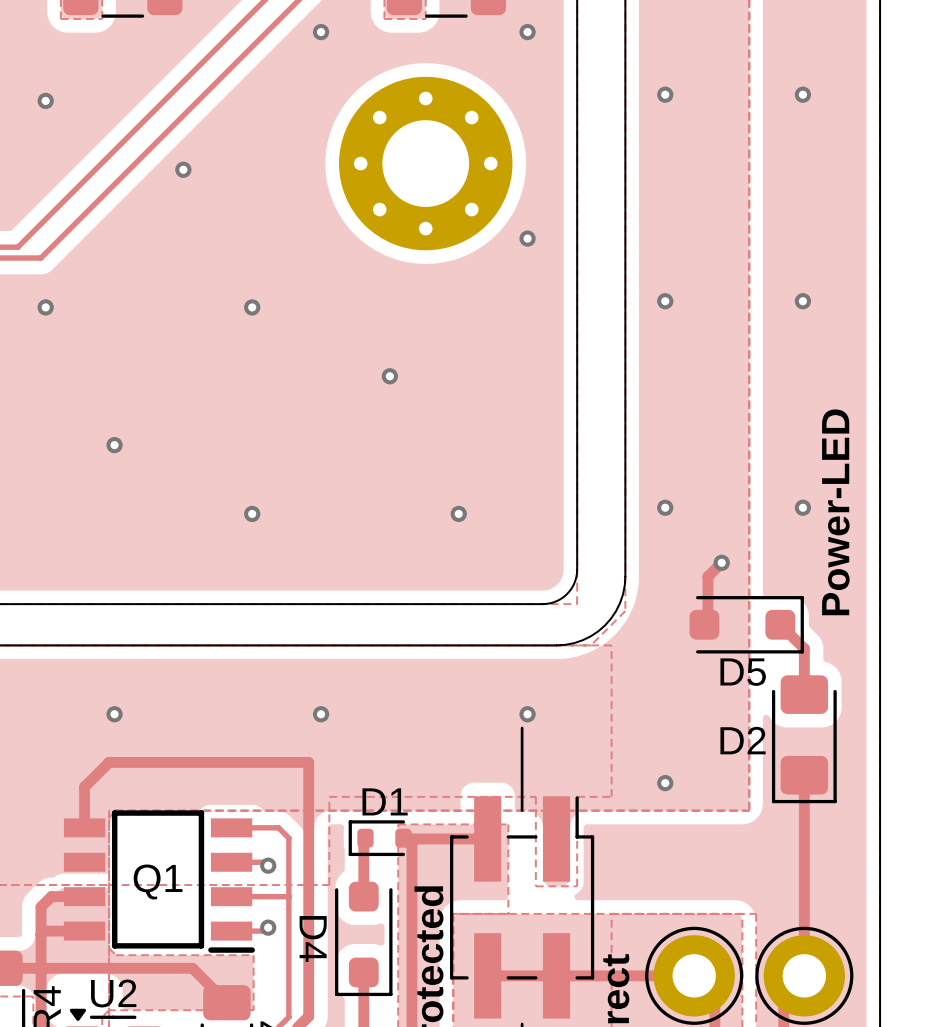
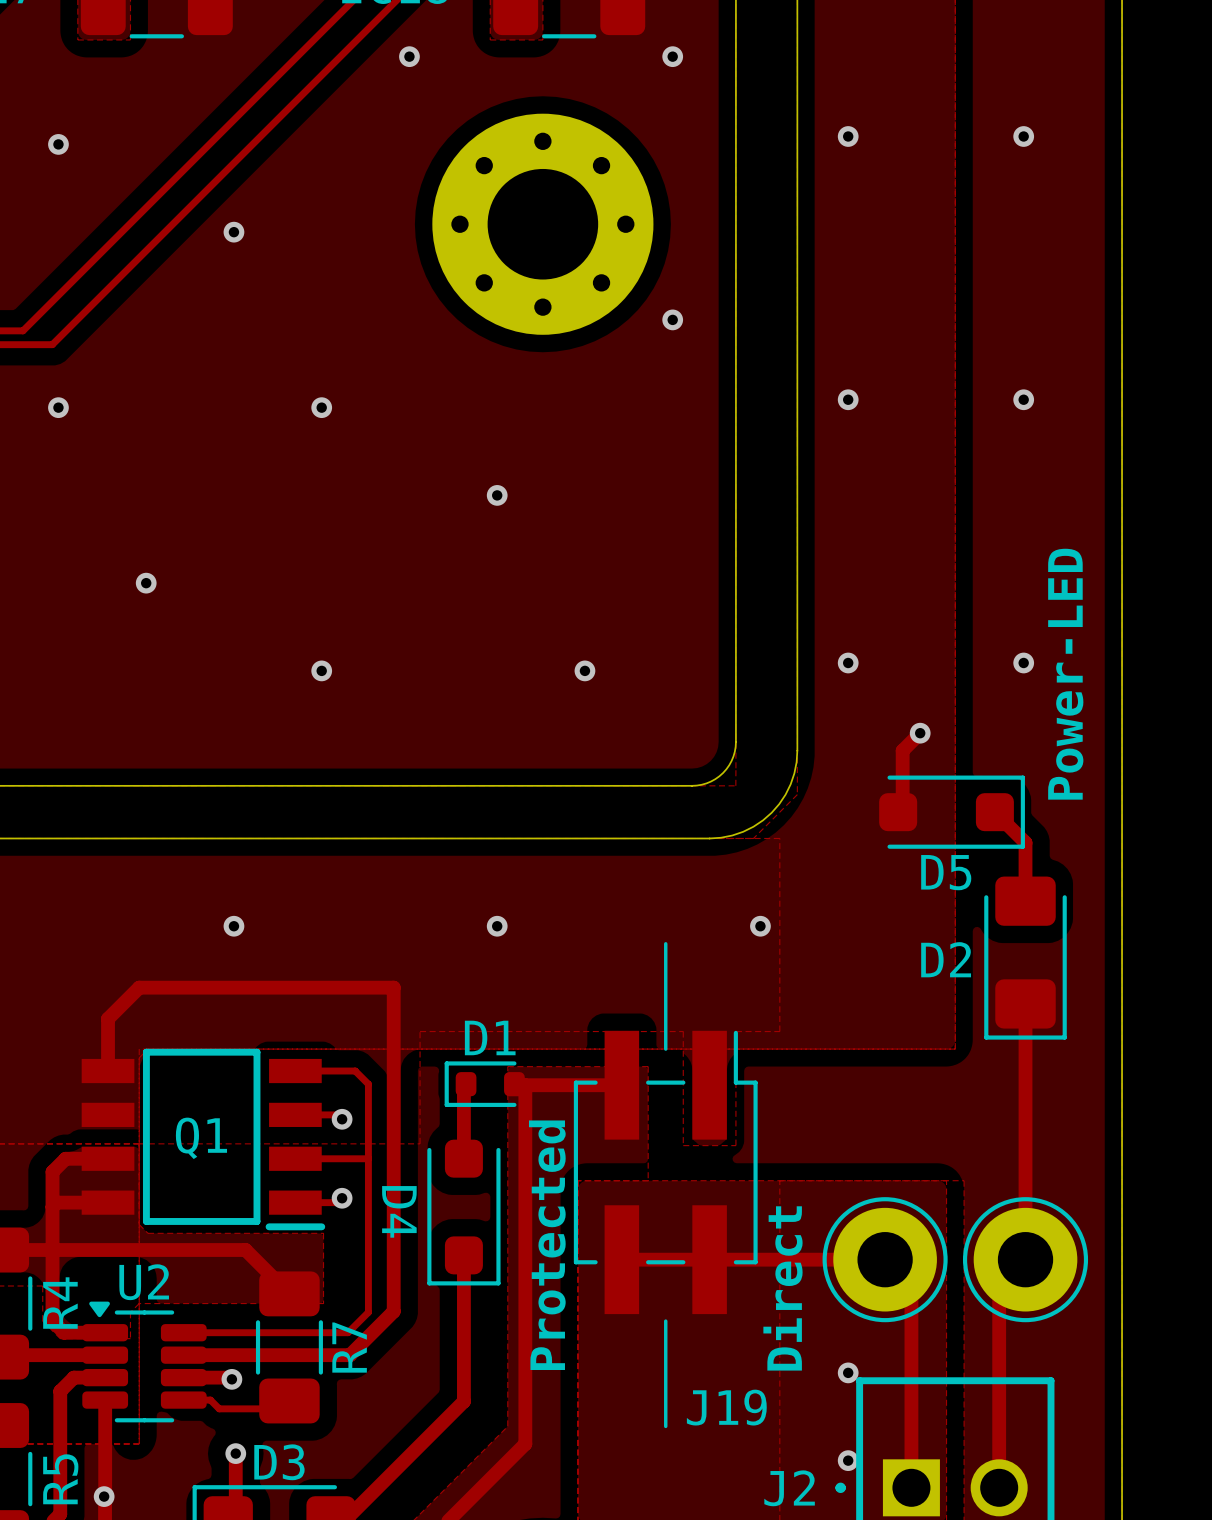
via: (114, 714) -> none
via: none -> (233, 926)
via: (321, 714) -> none
via: none -> (497, 926)
via: (527, 714) -> none
via: none -> (760, 926)
via: (665, 783) -> none

